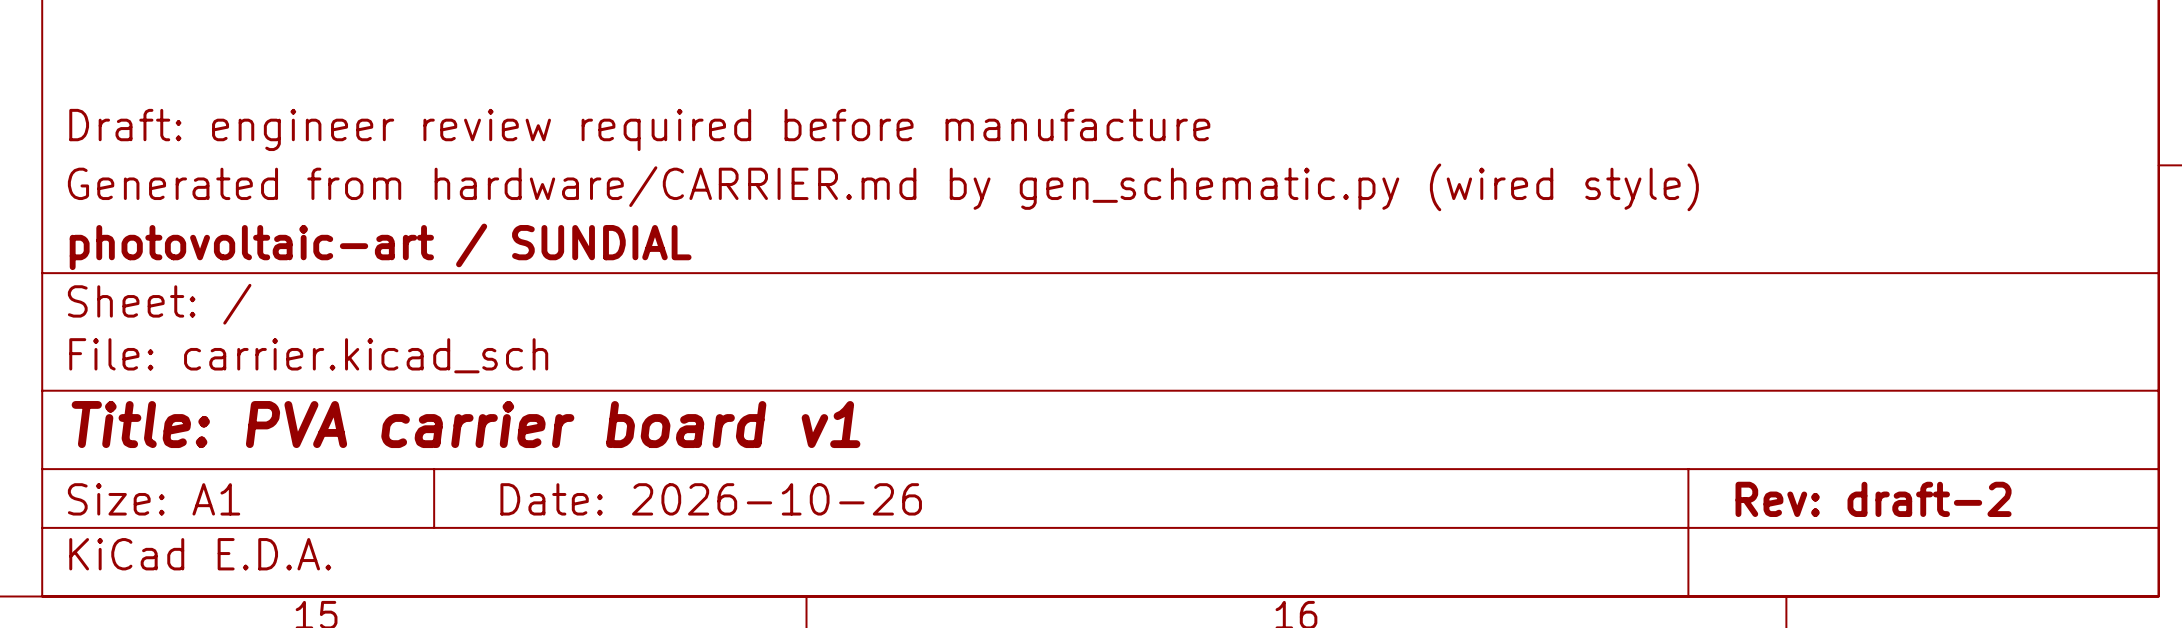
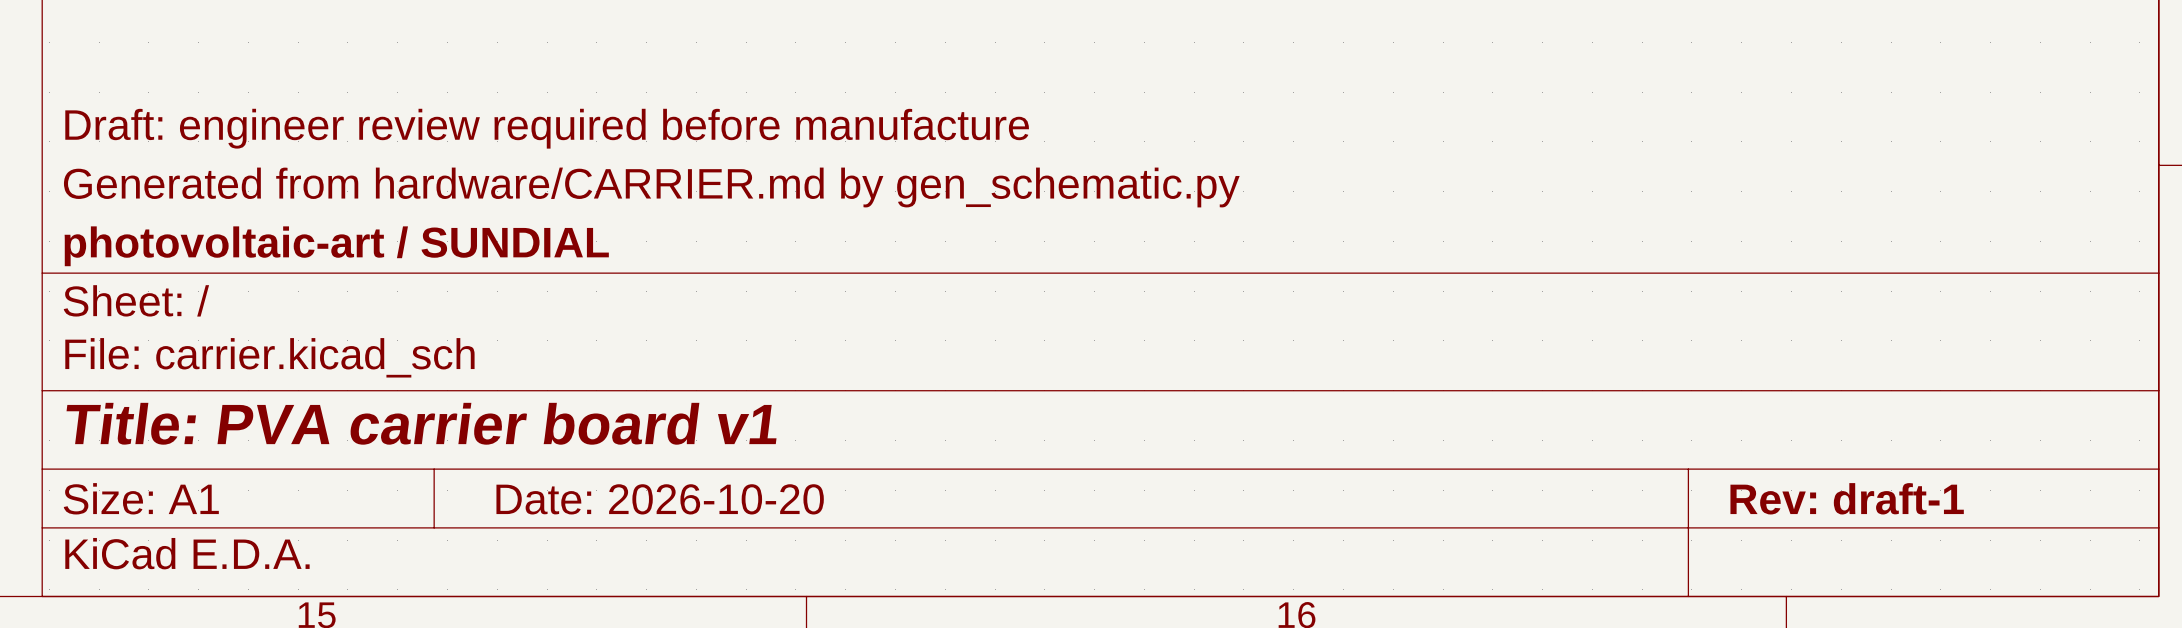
title block: Generated from hardware/CARRIER.md by gen_schematic.py (wired style) (883, 187) -> Generated from hardware/CARRIER.md by gen_schematic.py (651, 187)
title block: Date: 2026-10-26 (711, 499) -> Date: 2026-10-20 (660, 499)
title block: Rev: draft-2 (1873, 499) -> Rev: draft-1 (1847, 498)

